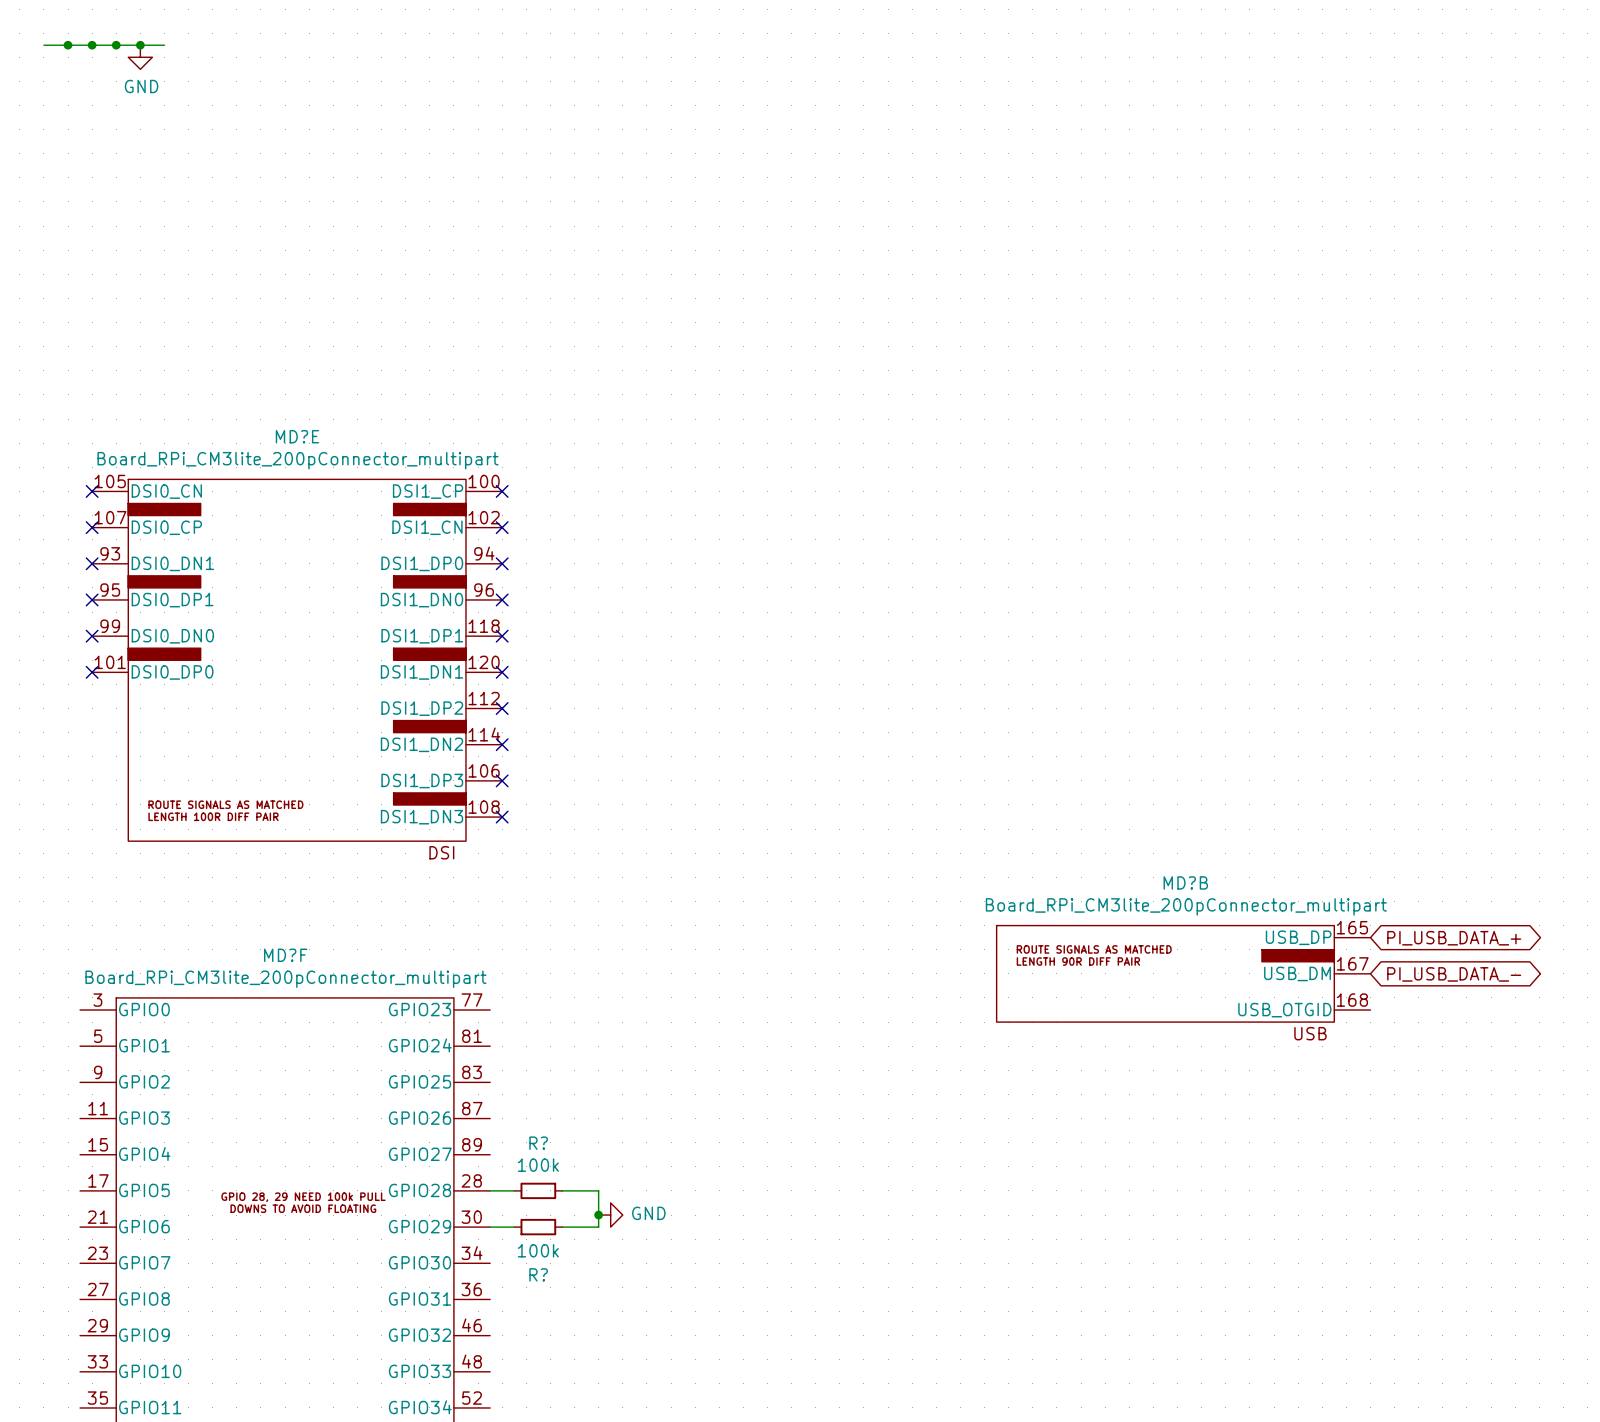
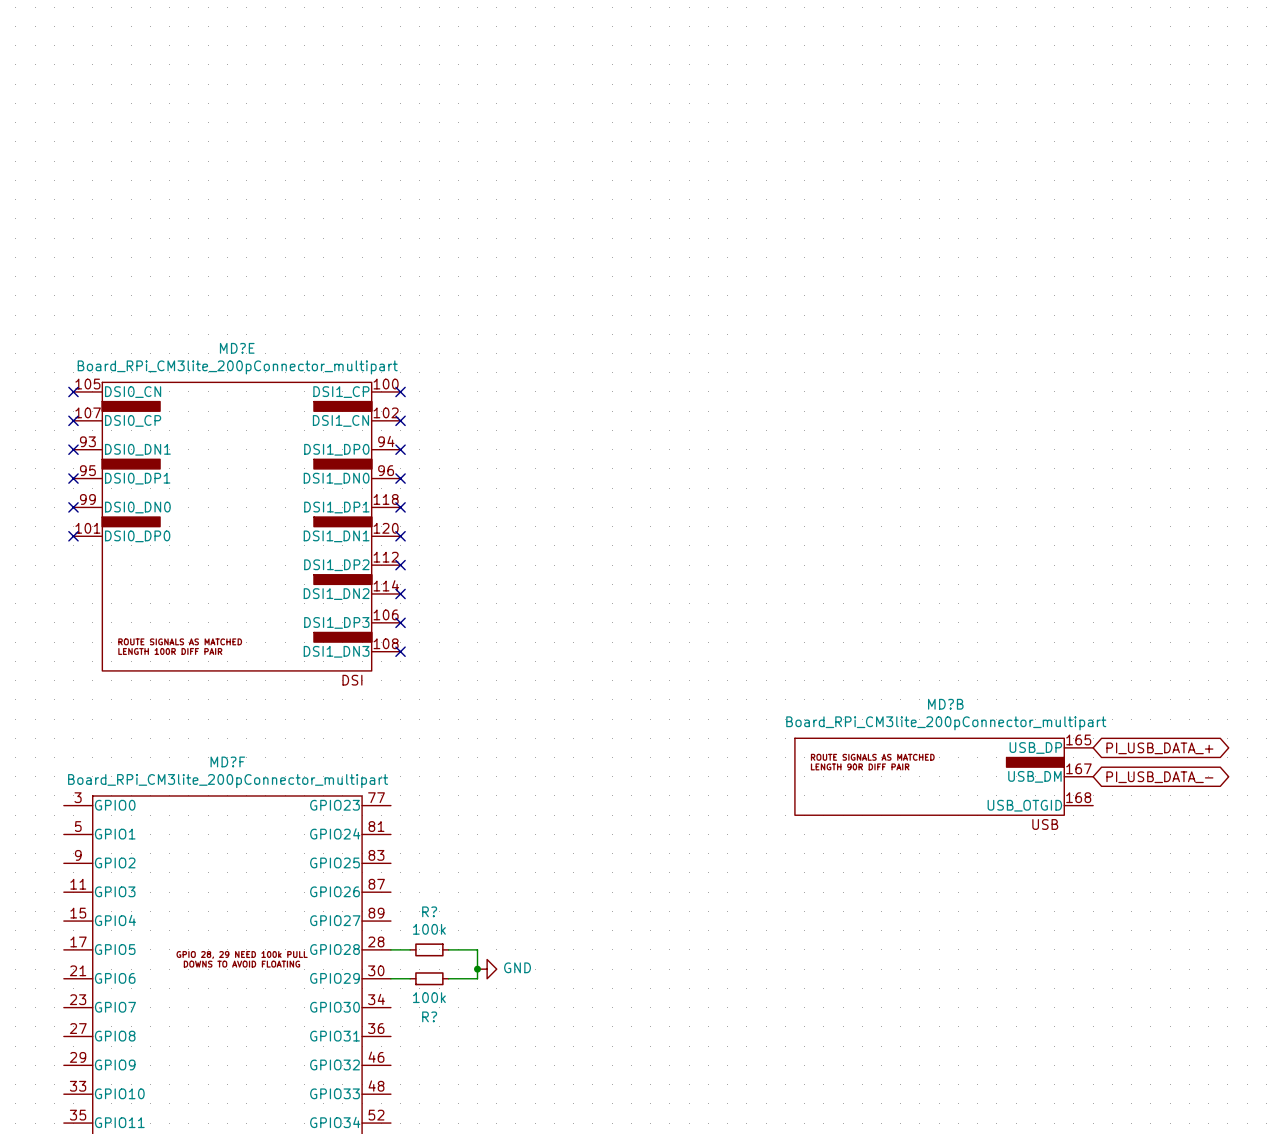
wire: (43, 45) (164, 45) -> none
junction: (68, 45) -> none
junction: (92, 45) -> none
junction: (116, 45) -> none
junction: (140, 45) -> none
power symbol: GND (140, 57) -> none

